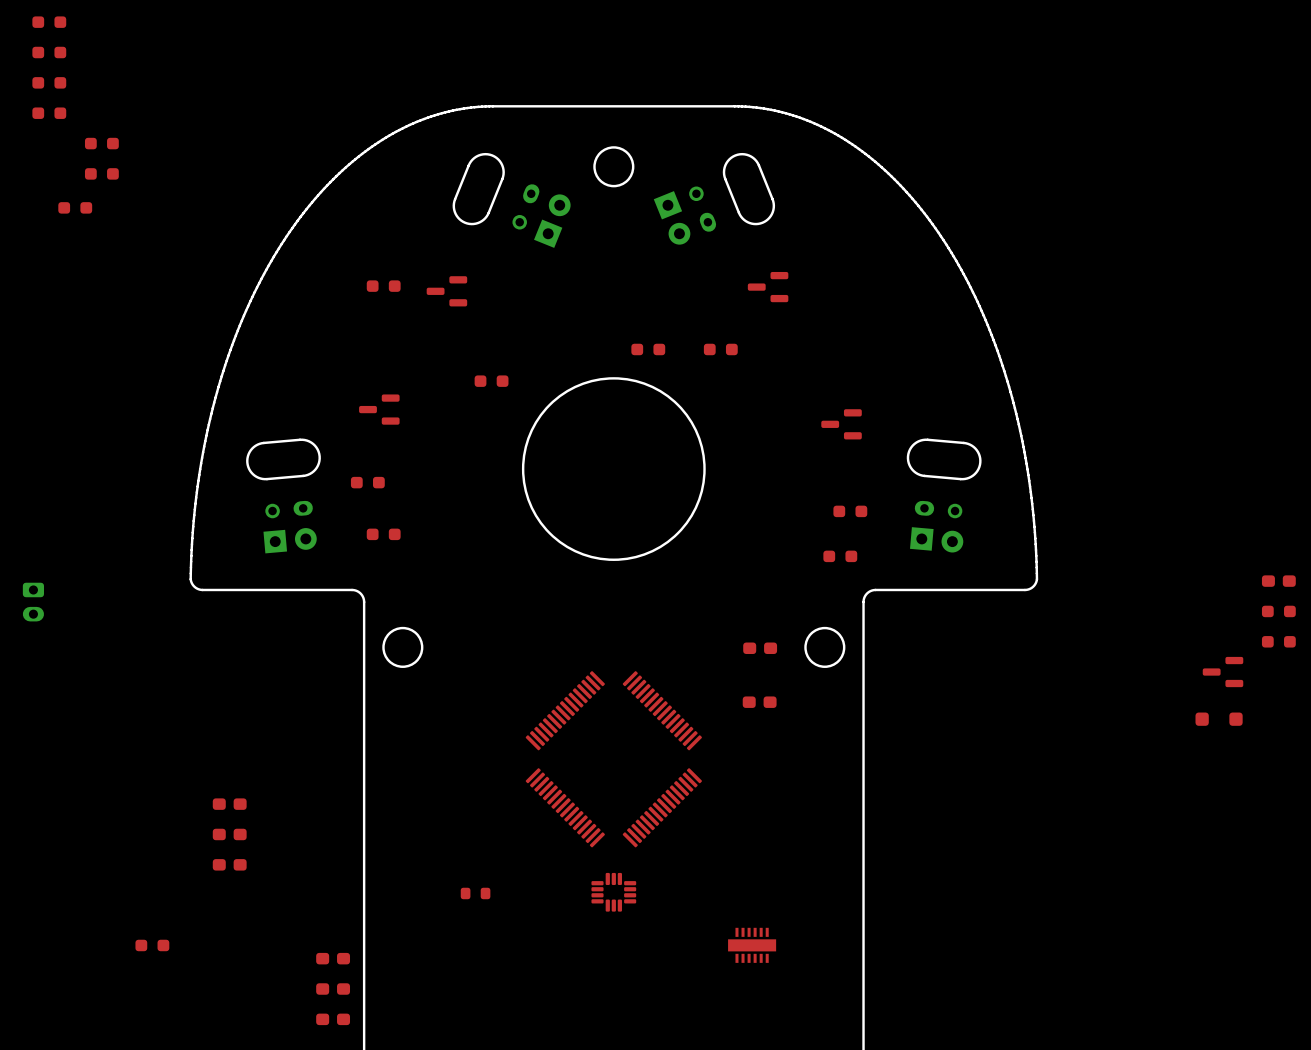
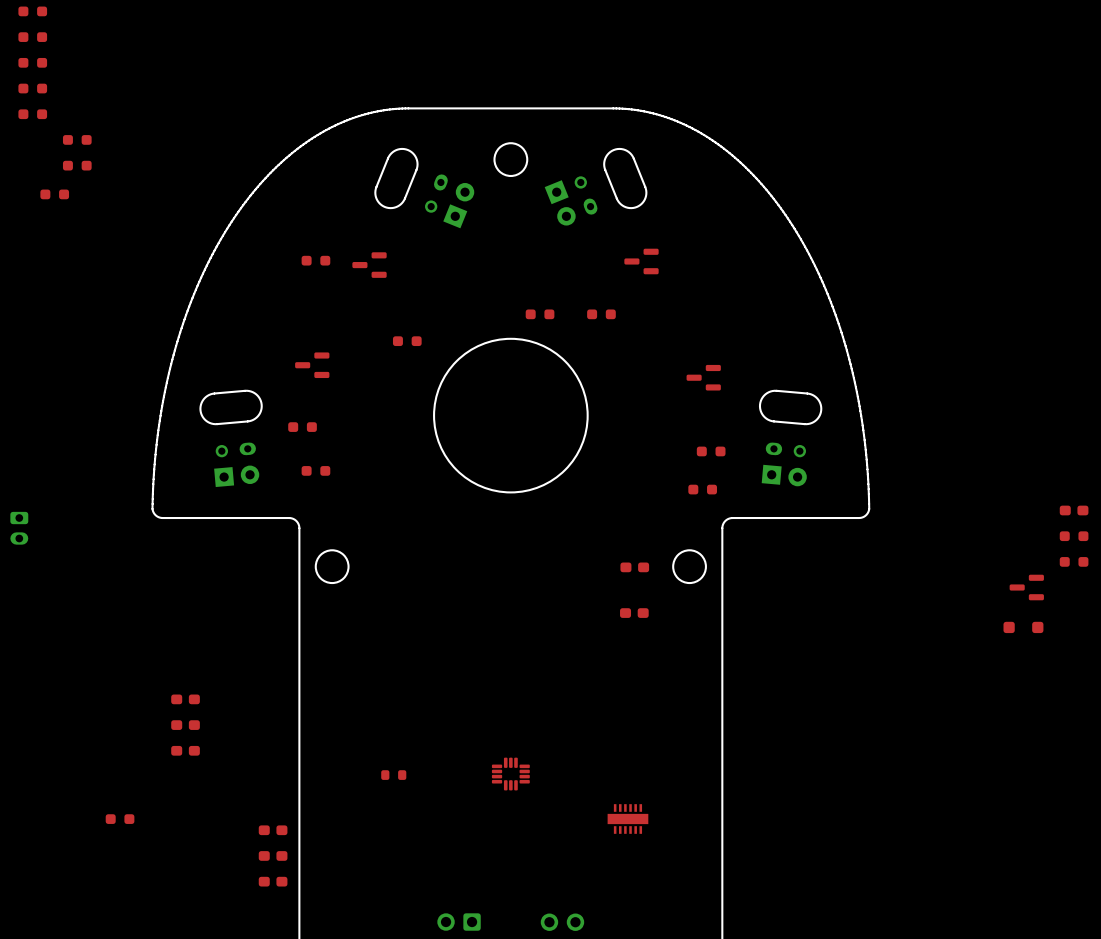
part: (613, 759) -> none

